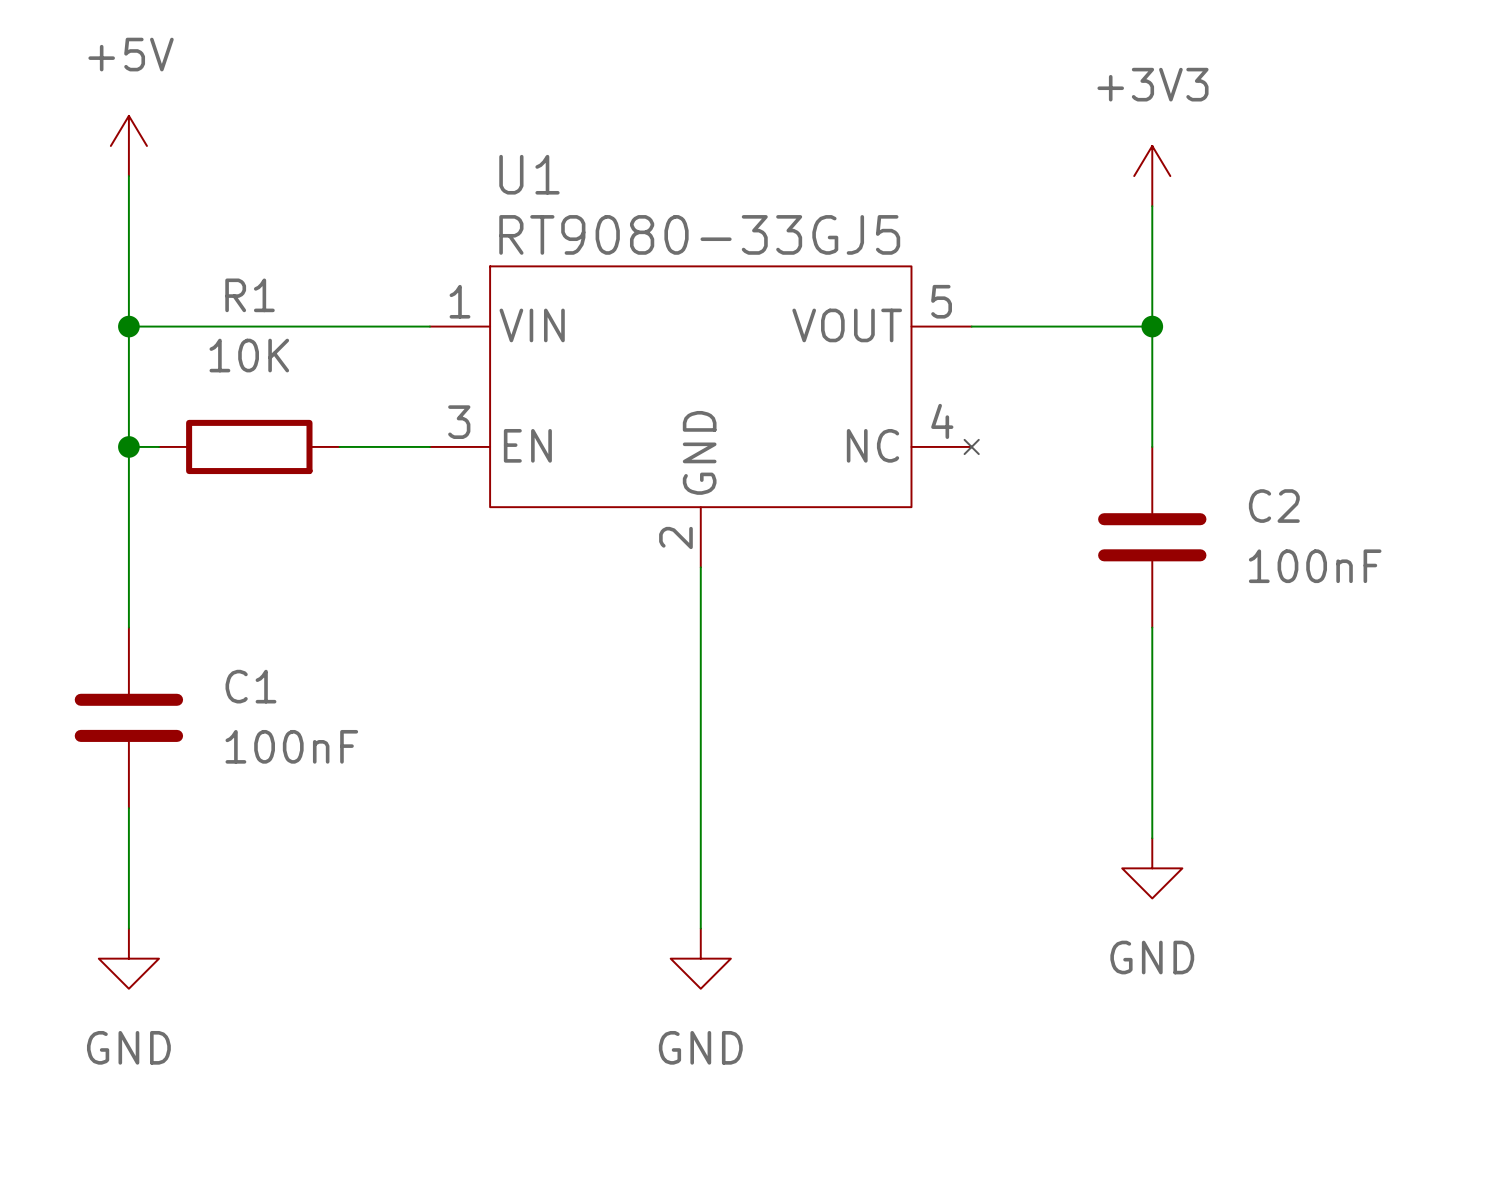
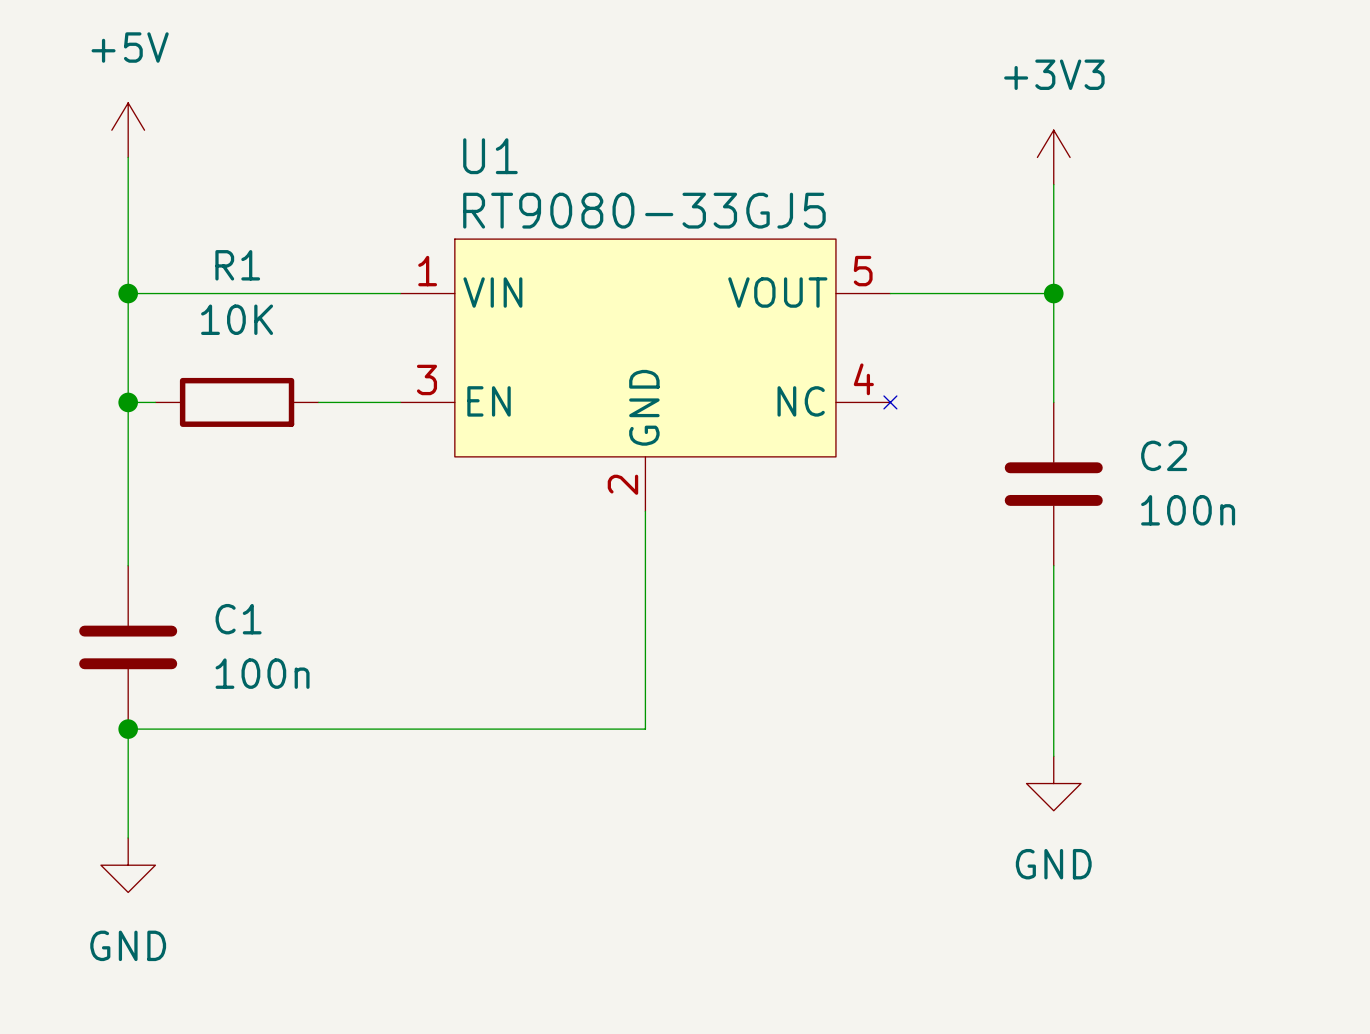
C2 value: 100nF (1315, 566) -> 100n (1188, 510)
C1 value: 100nF (291, 746) -> 100n (262, 673)
junction: none -> (128, 729)
wire: (700, 808) (700, 928) -> (645, 729) (128, 729)
power symbol: GND (700, 958) -> none

